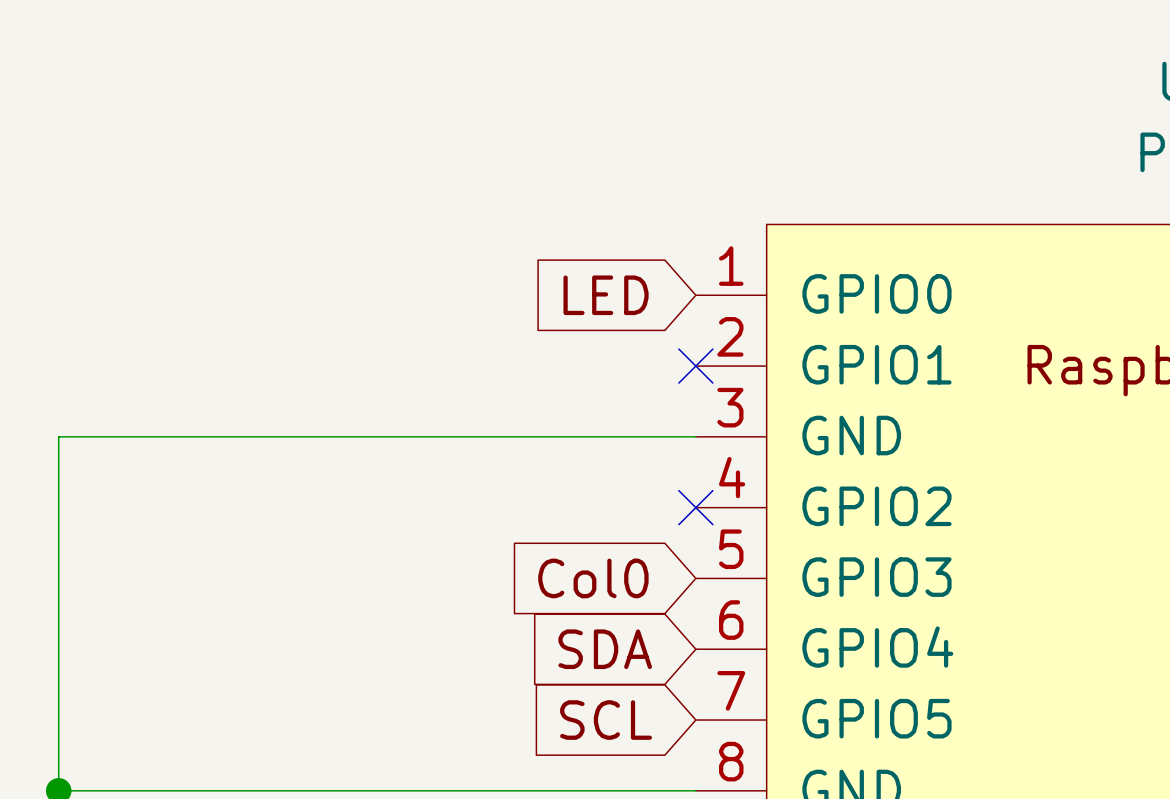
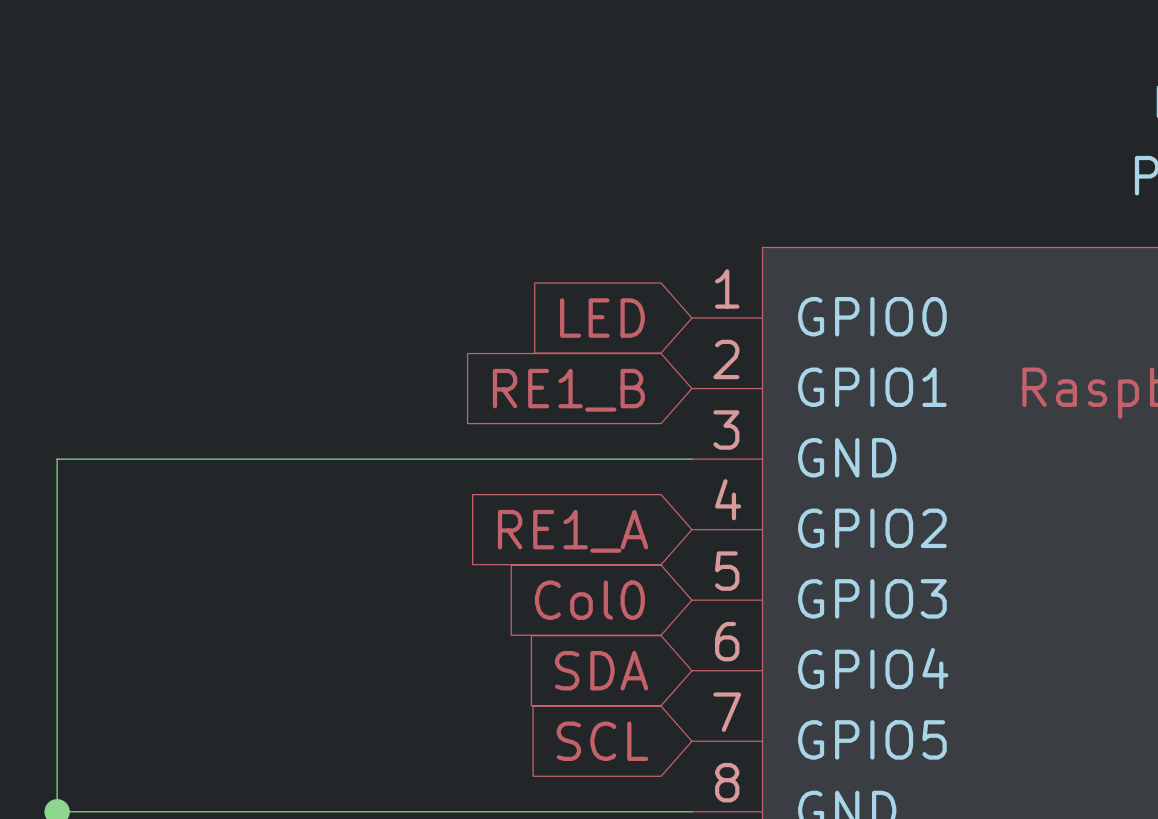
no-connect mark: (695, 366) -> none
global label: none -> RE1_B (568, 390)
no-connect mark: (695, 507) -> none
global label: none -> RE1_A (573, 531)

